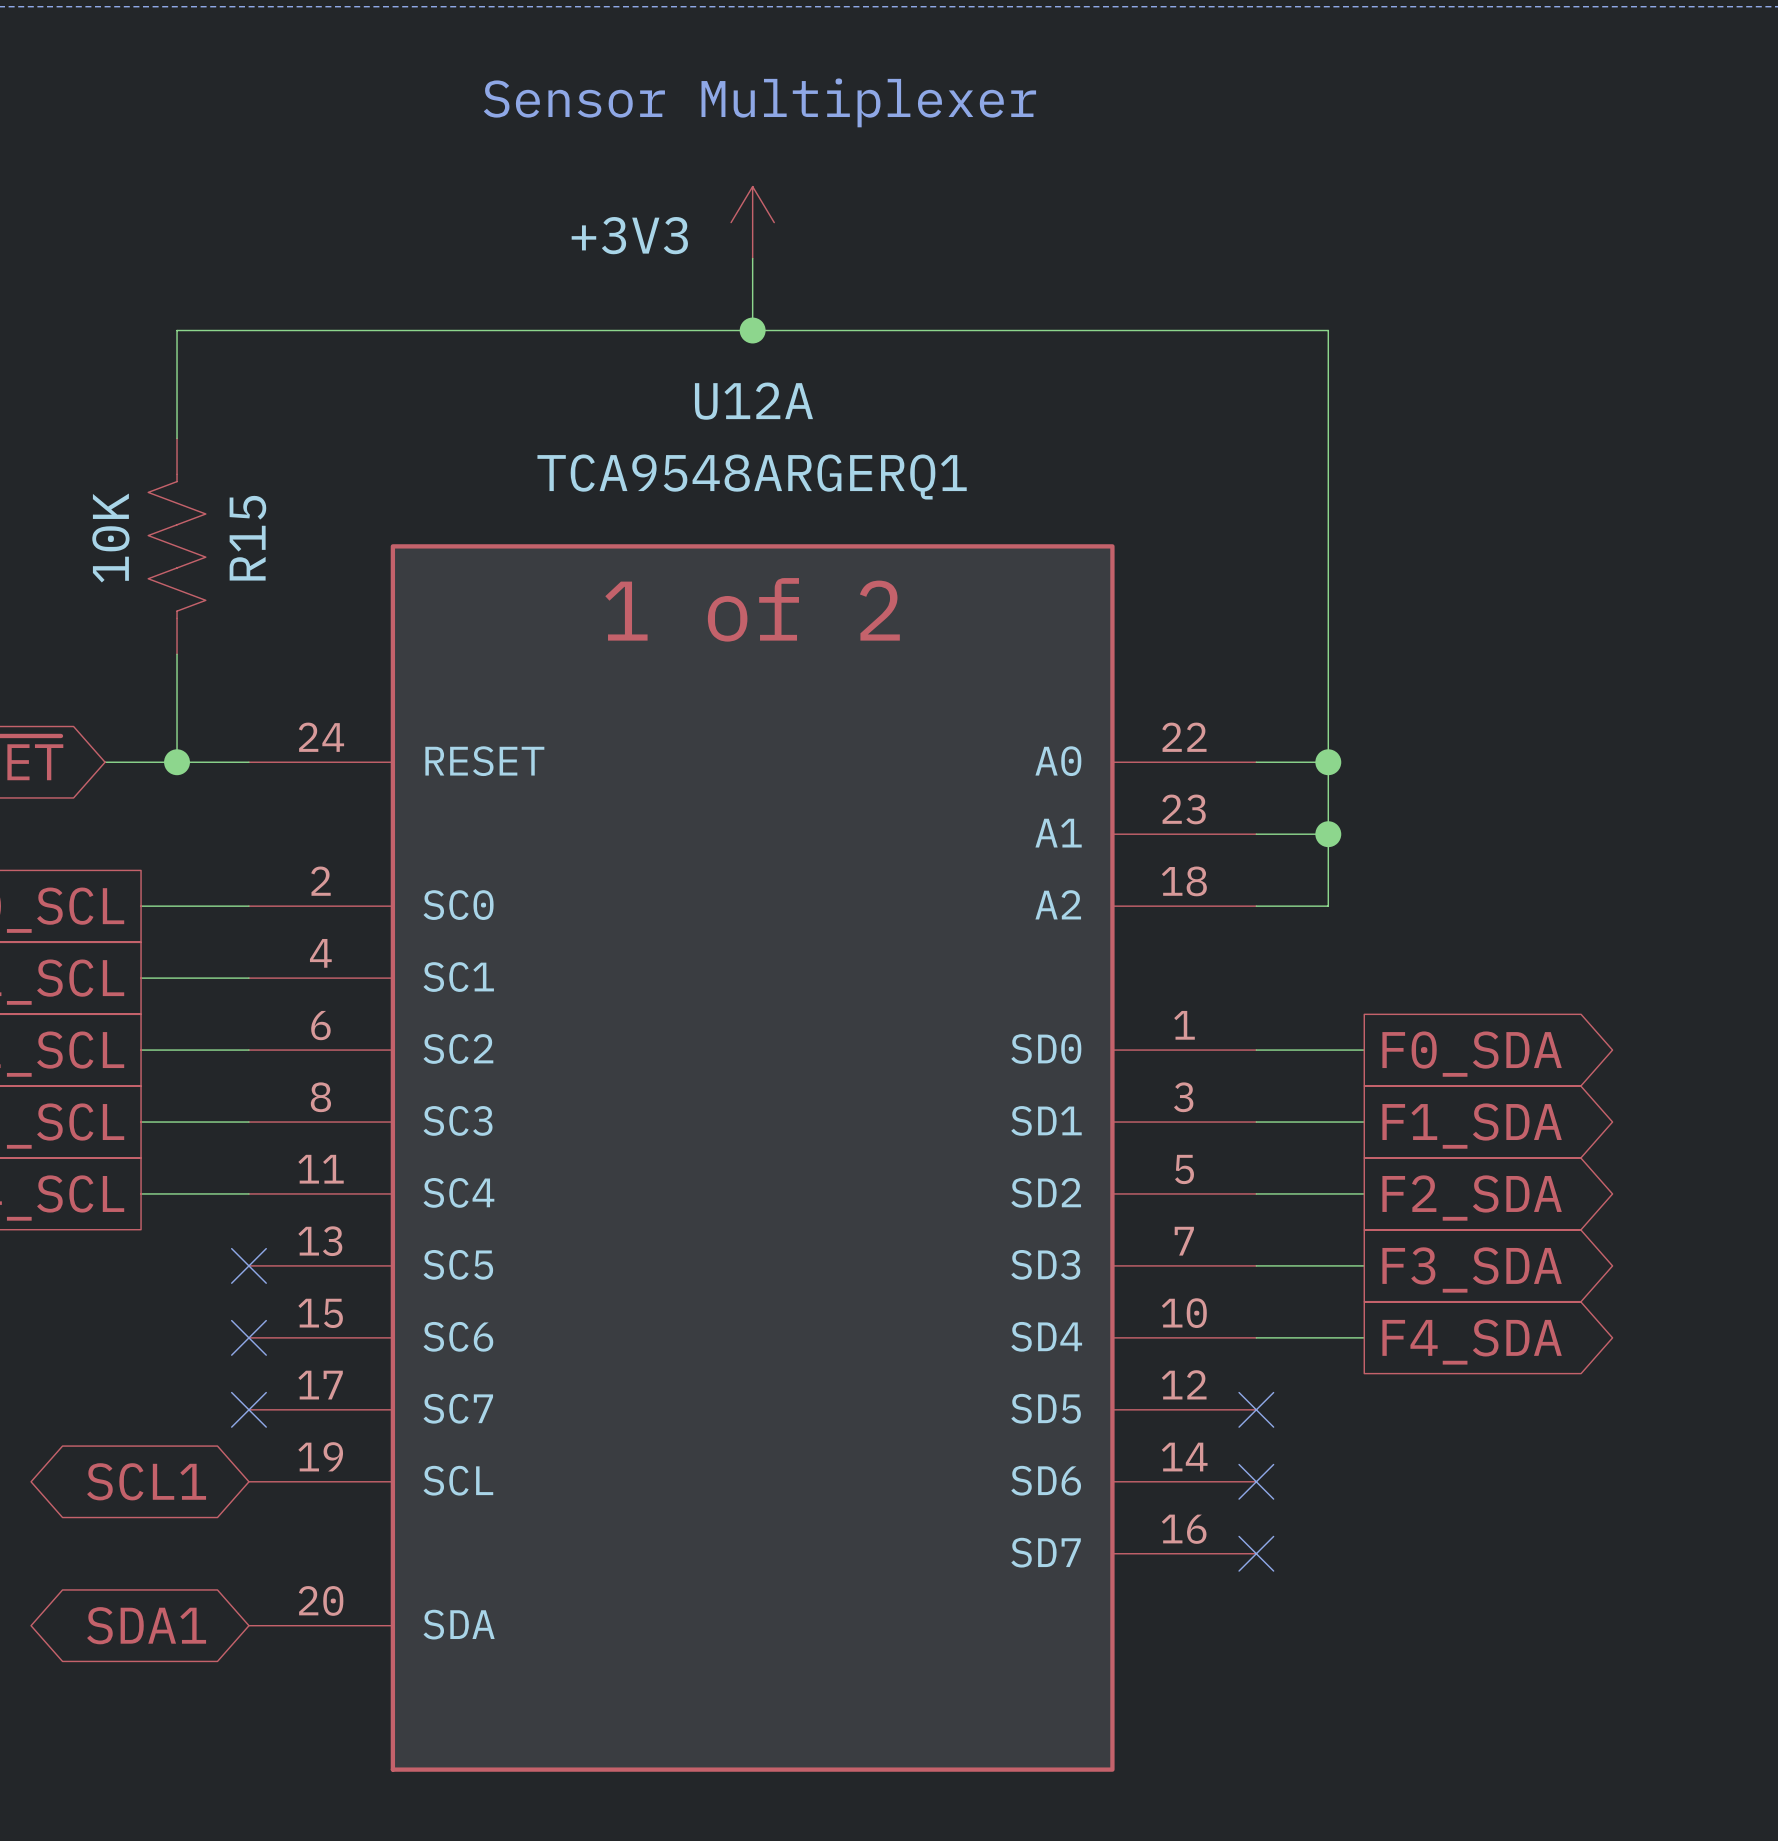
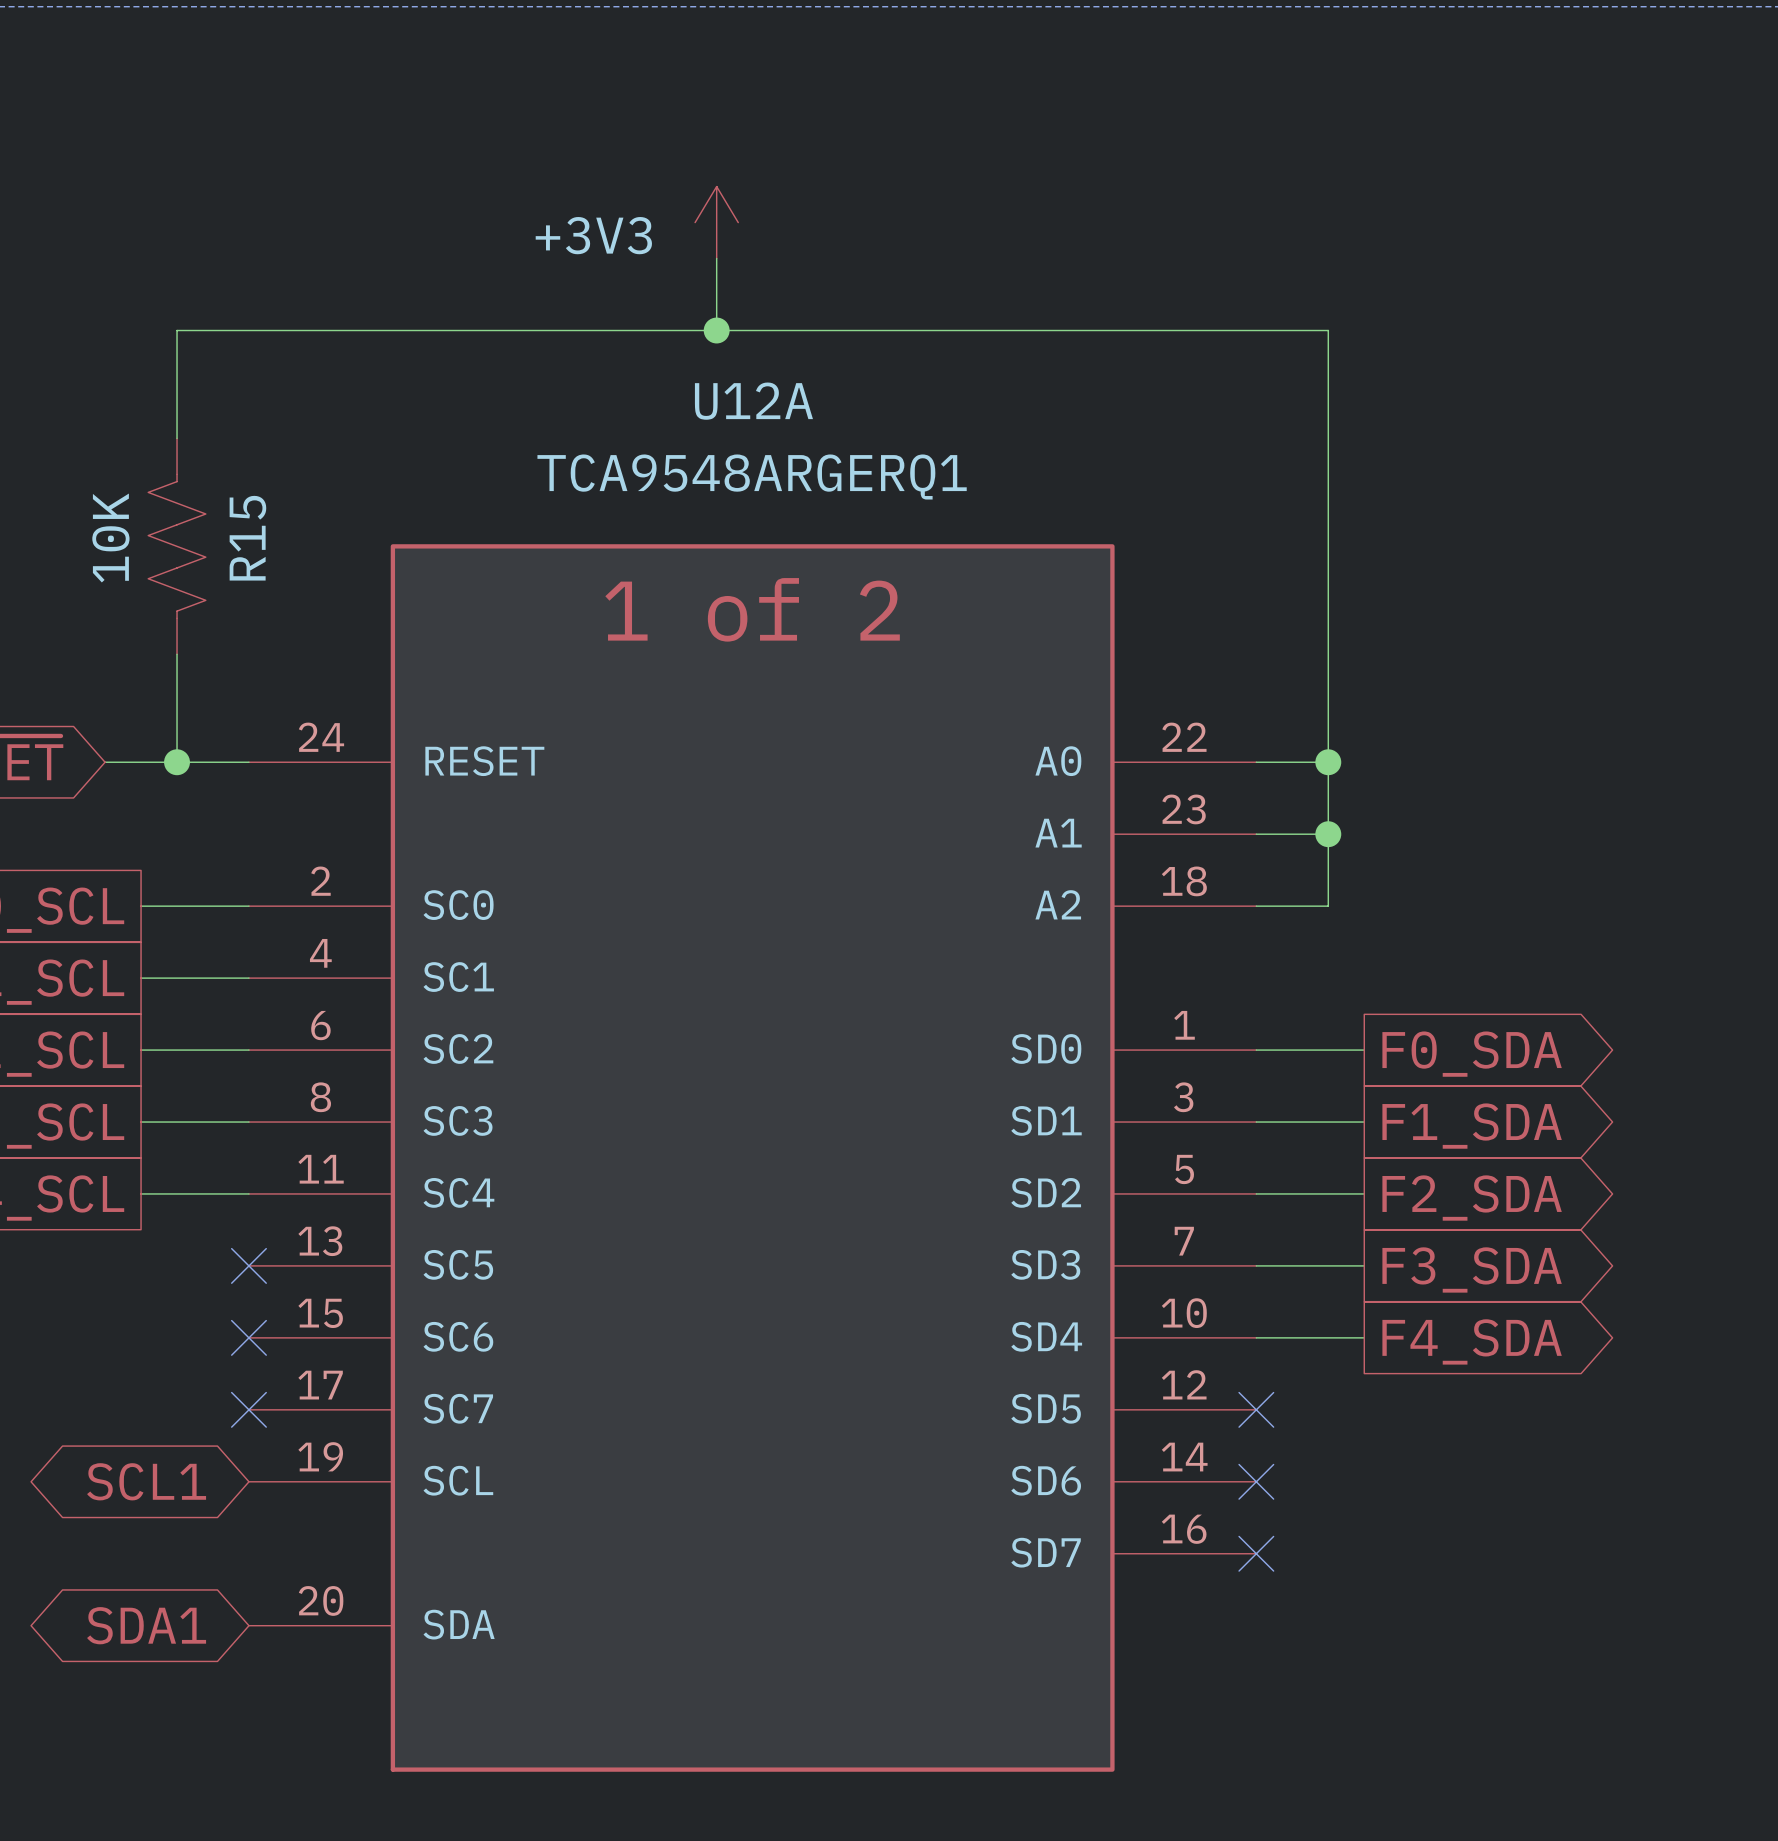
text: Sensor Multiplexer (759, 102) -> none
power symbol position: +3V3 (752, 222) -> +3V3 (716, 222)
wire: (752, 258) (752, 330) -> (716, 258) (716, 330)
junction position: (752, 330) -> (716, 330)

